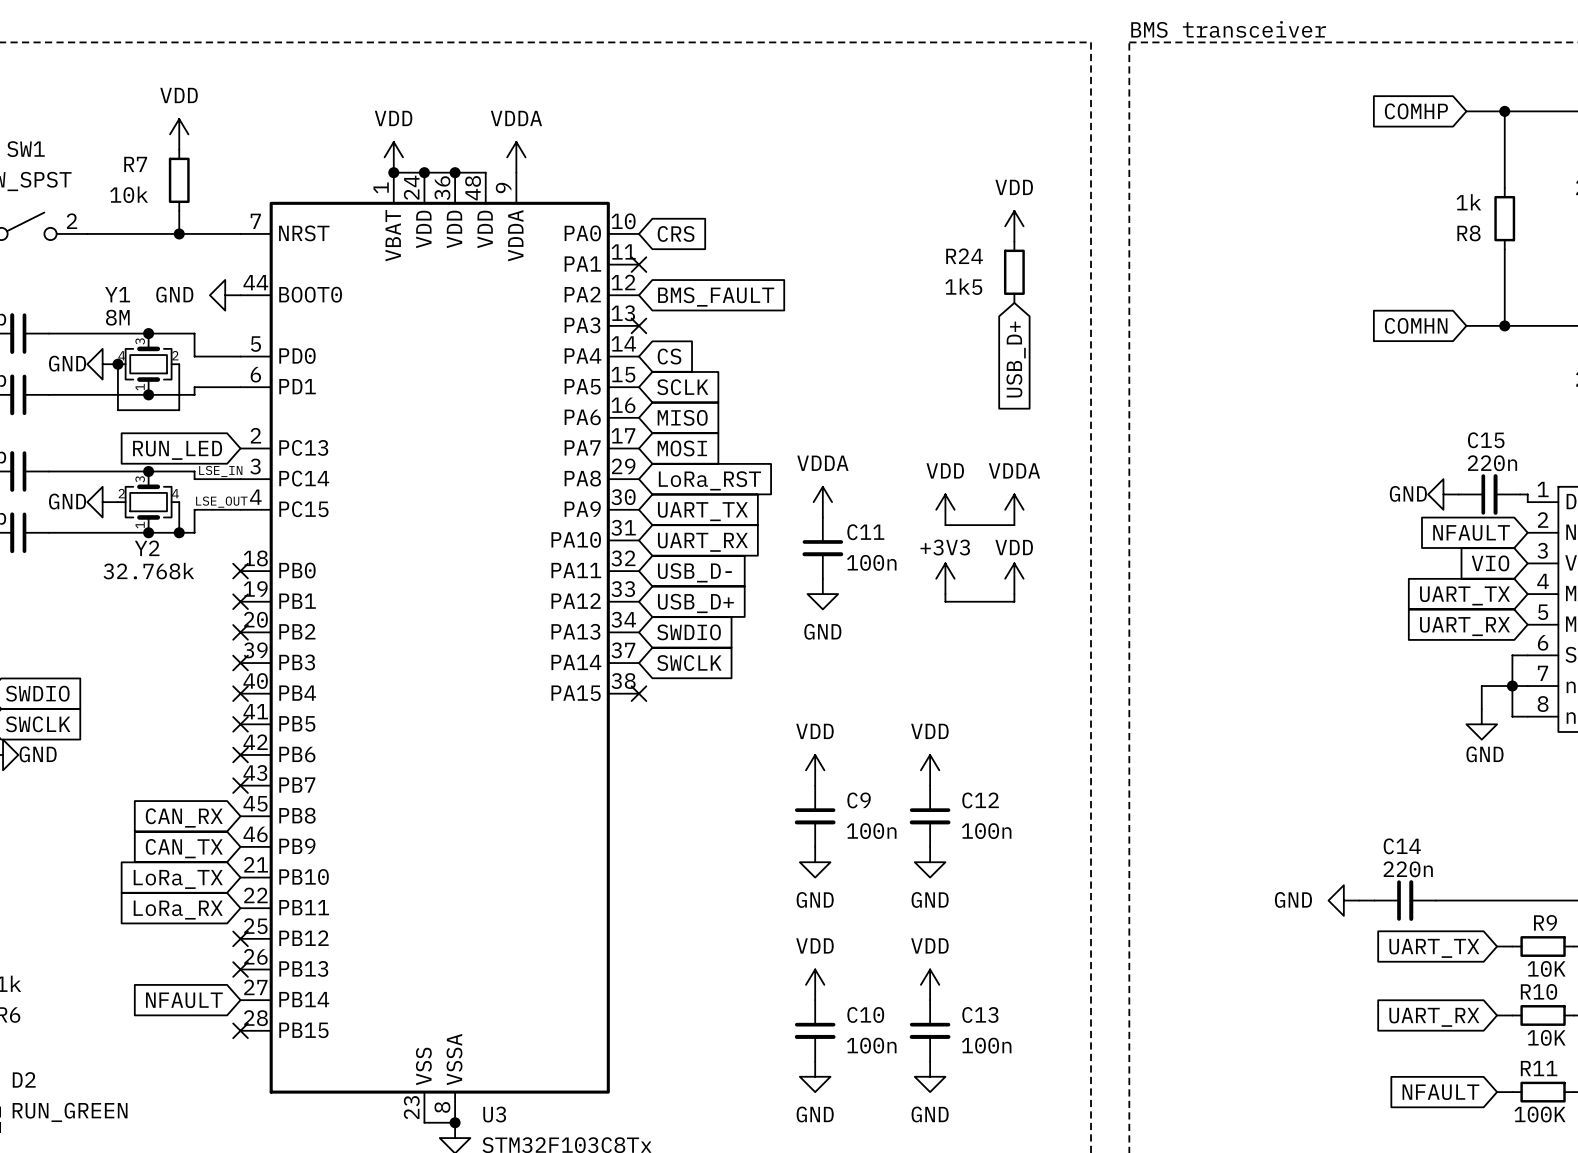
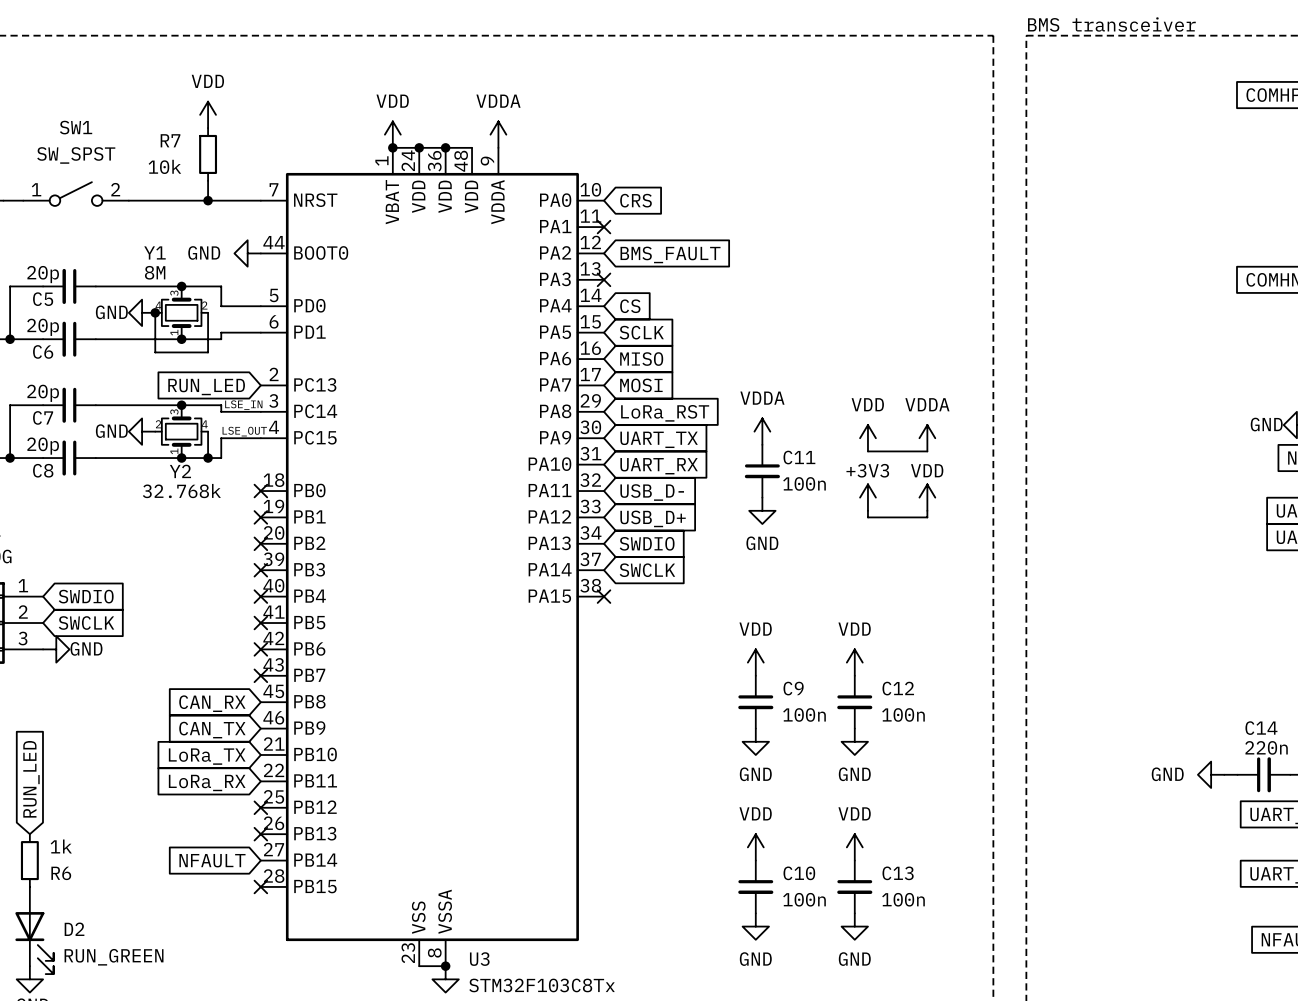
power symbol: VDD (1014, 226) -> none
R24: 1k5 (1014, 272) -> none
global label: USB_D+ (1016, 359) -> none

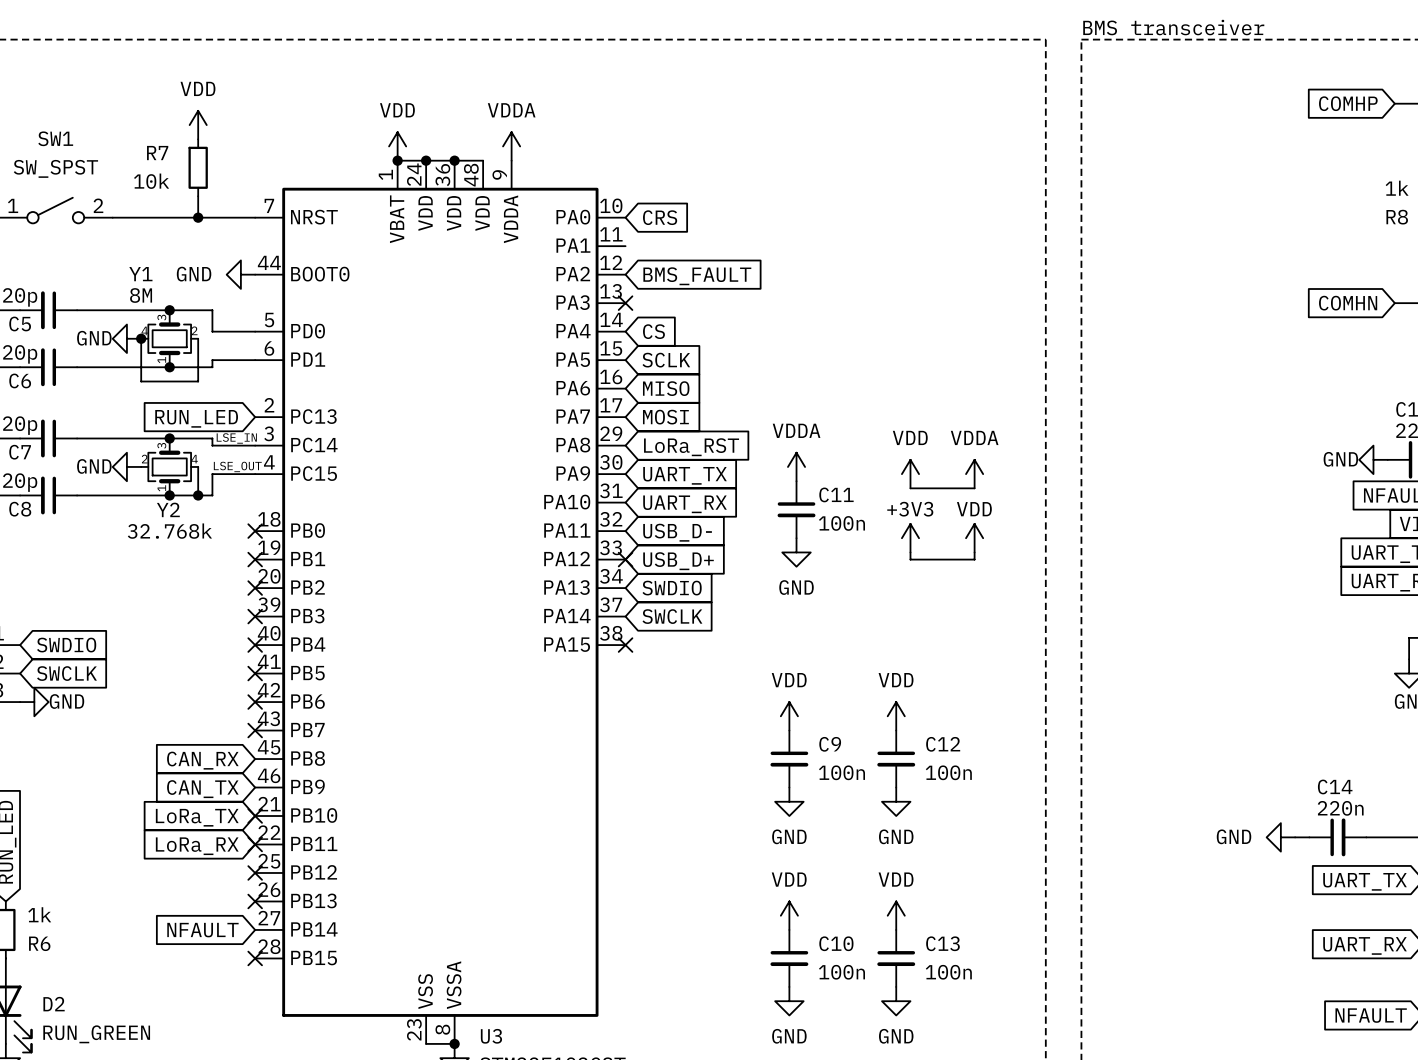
no-connect mark: (604, 227) -> none
no-connect mark: none -> (625, 559)
no-connect mark: none -> (255, 816)
no-connect mark: none -> (255, 844)

